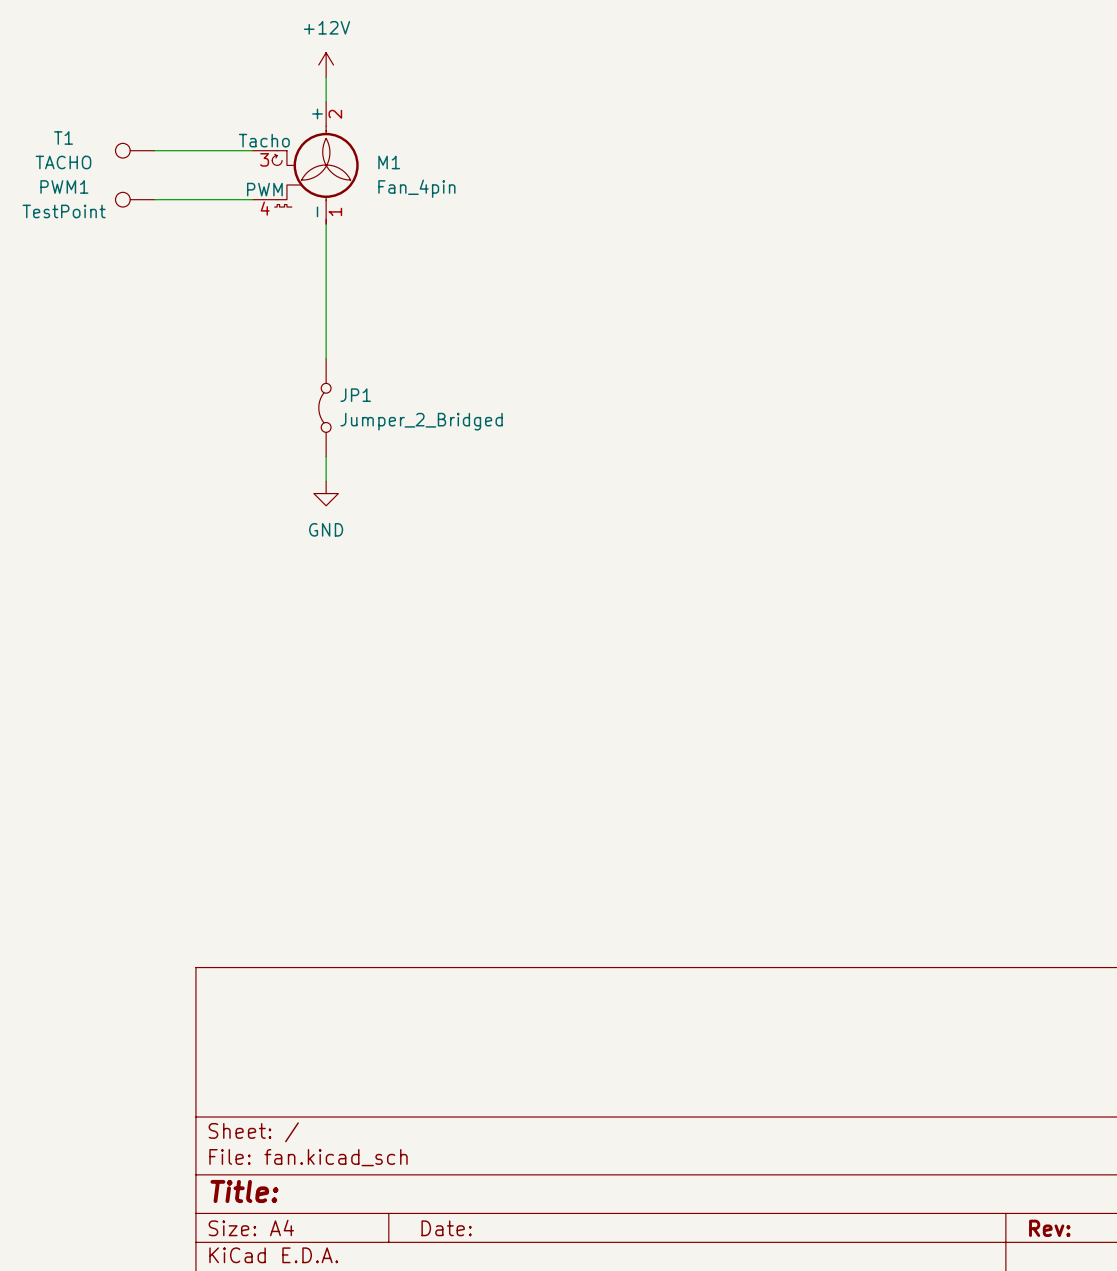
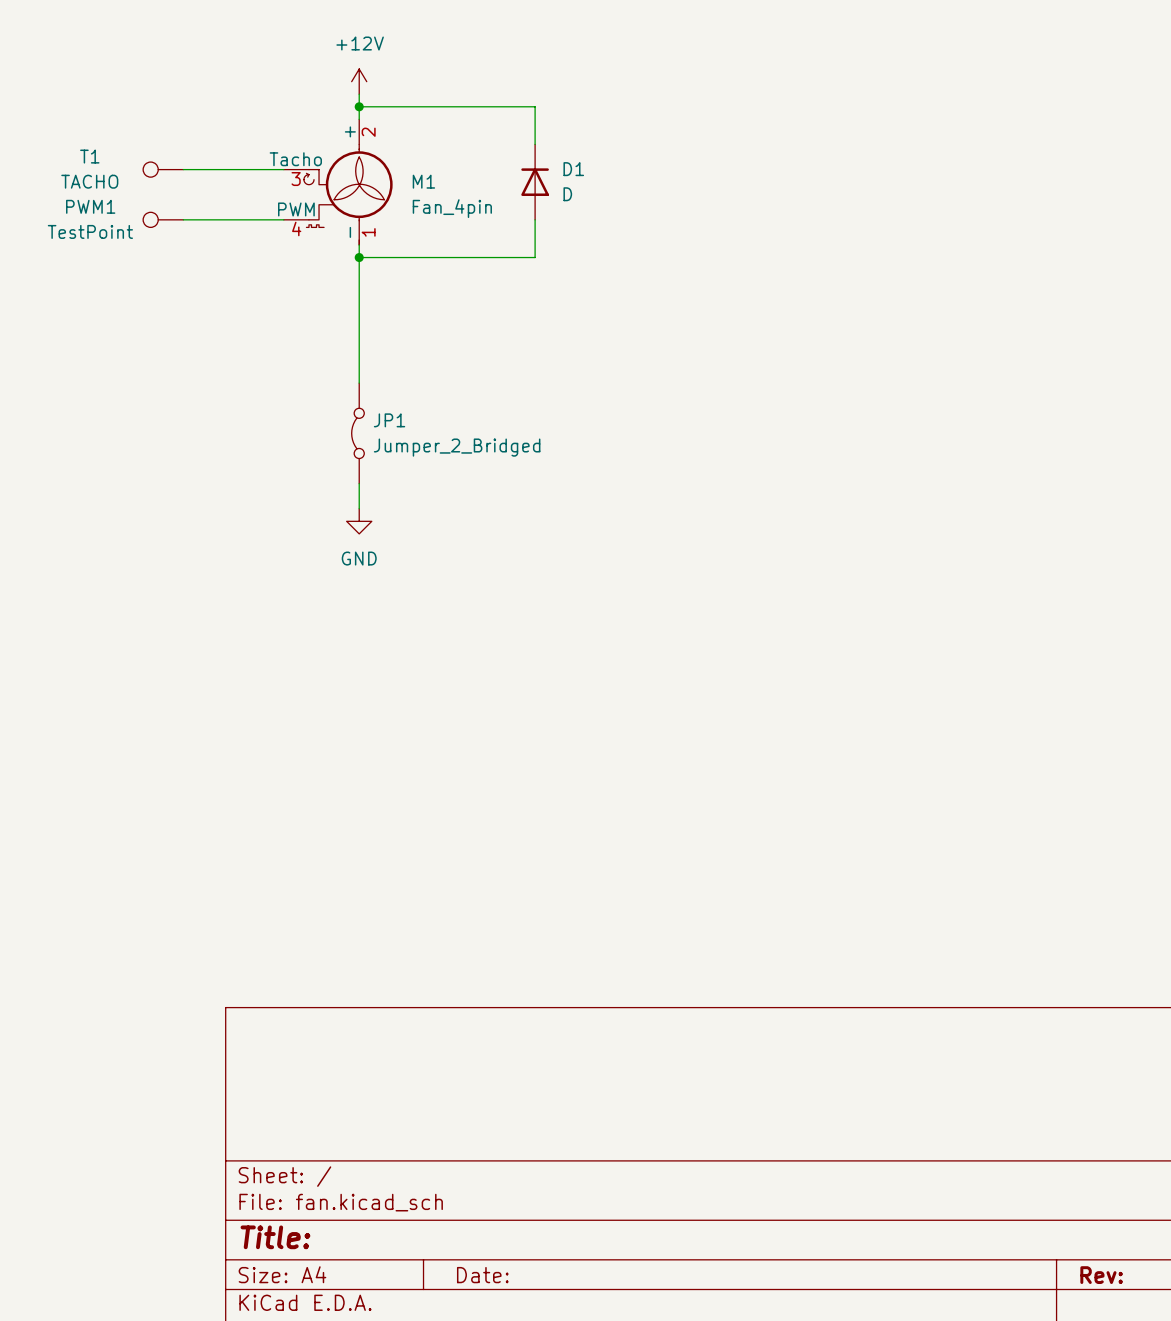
wire: none -> (359, 106) (535, 106) (535, 144)
junction: none -> (359, 106)
D1: none -> D (535, 182)
wire: none -> (535, 219) (535, 257) (359, 257)
junction: none -> (359, 257)

